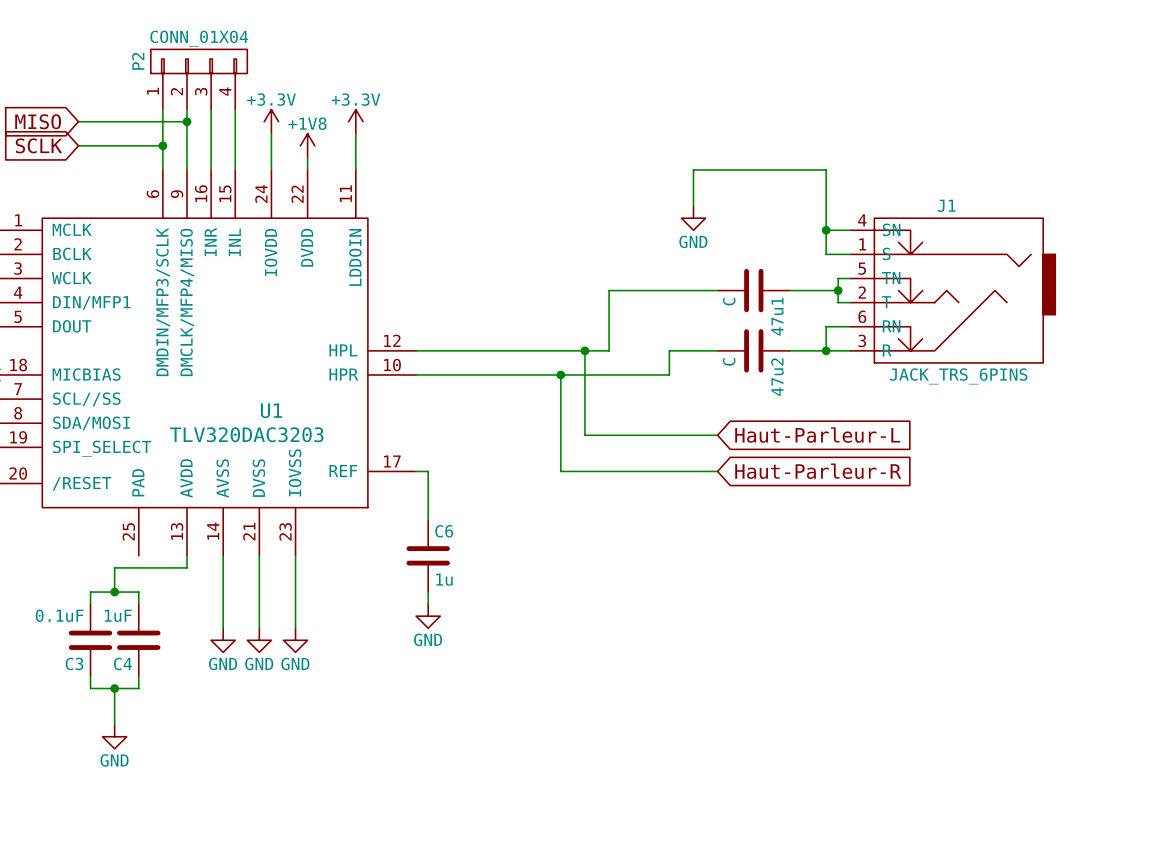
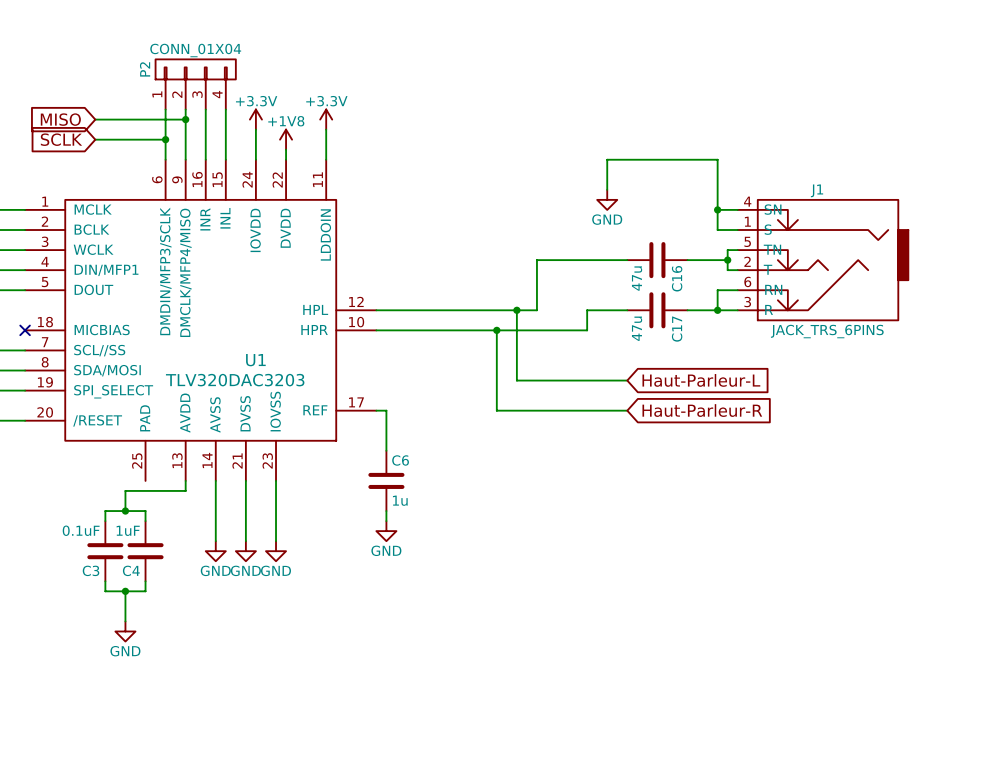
47u1 value: C (729, 301) -> 47u (637, 278)
47u1 name: 47u1 (777, 316) -> C16 (677, 278)
47u2 value: C (729, 361) -> 47u (637, 328)
47u2 name: 47u2 (777, 377) -> C17 (677, 329)

